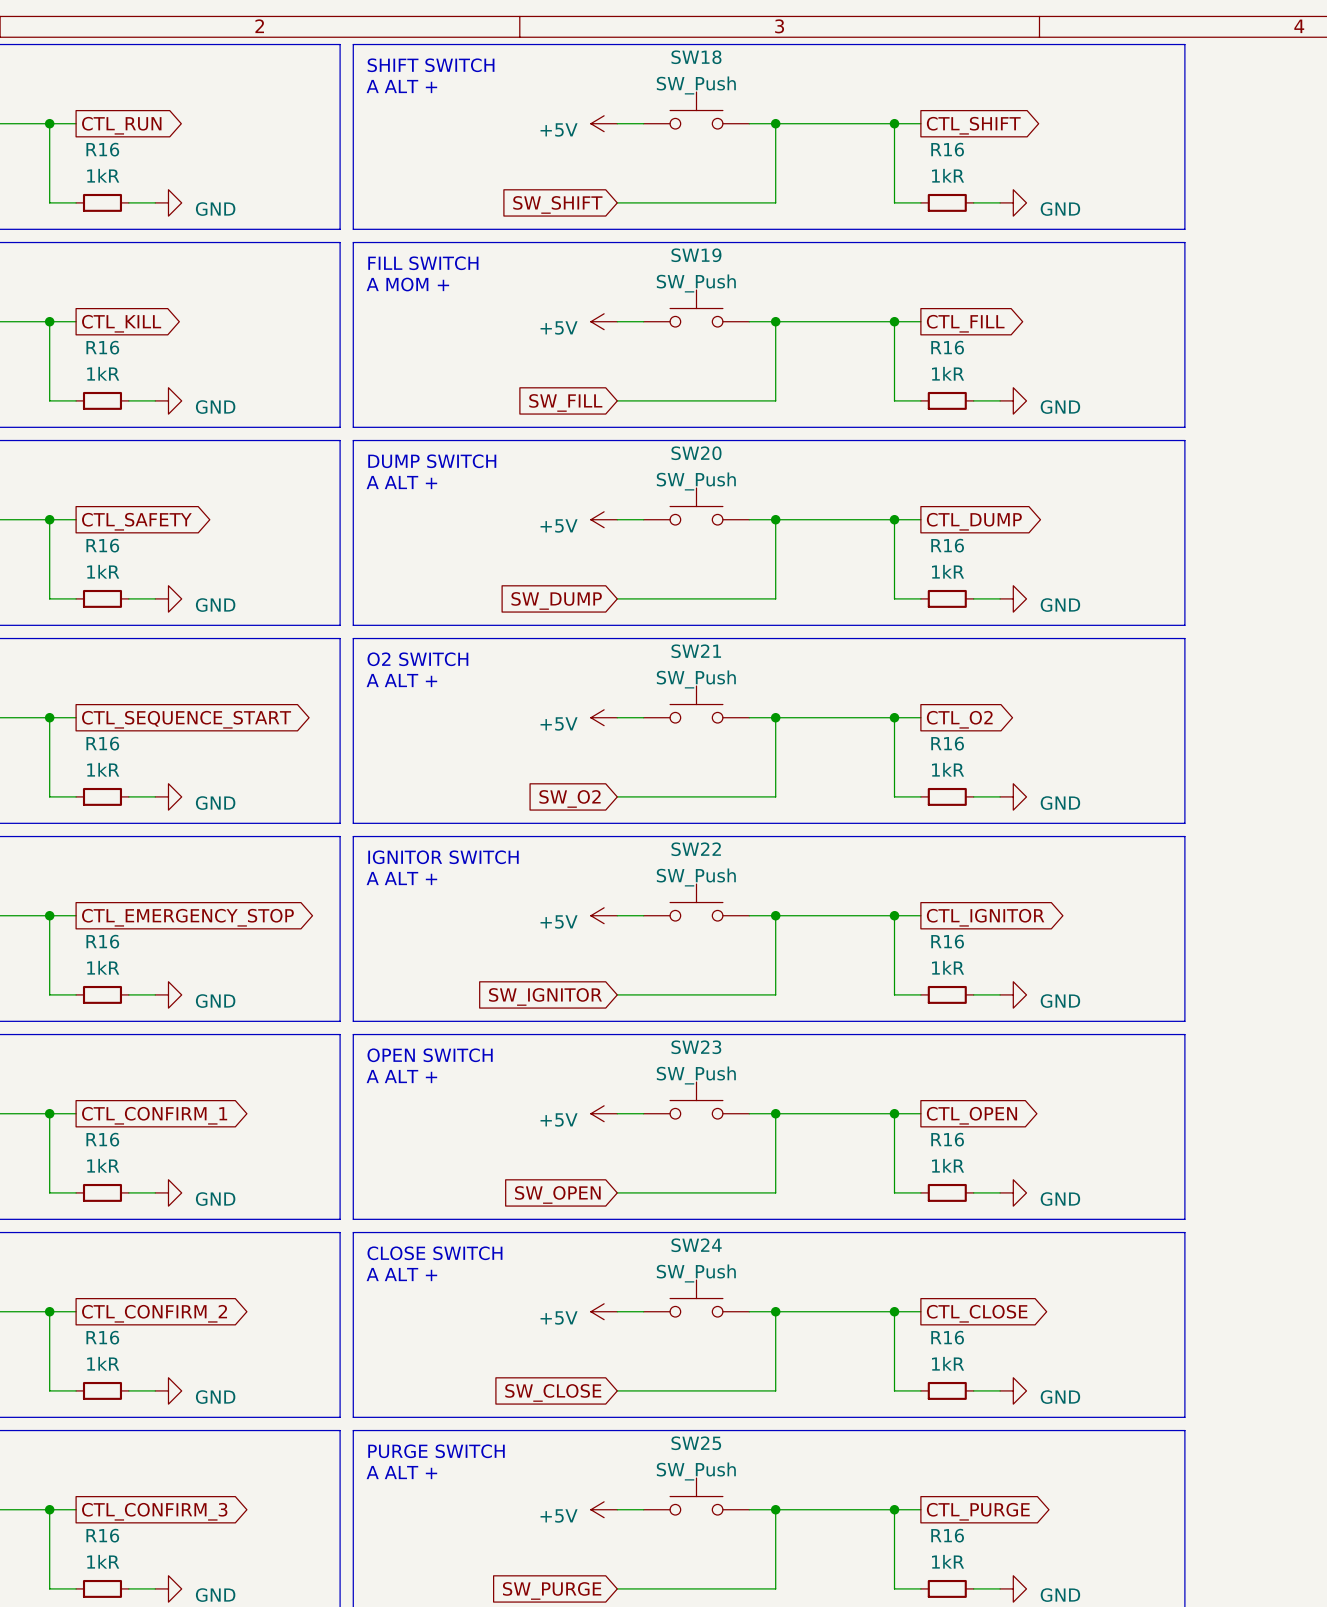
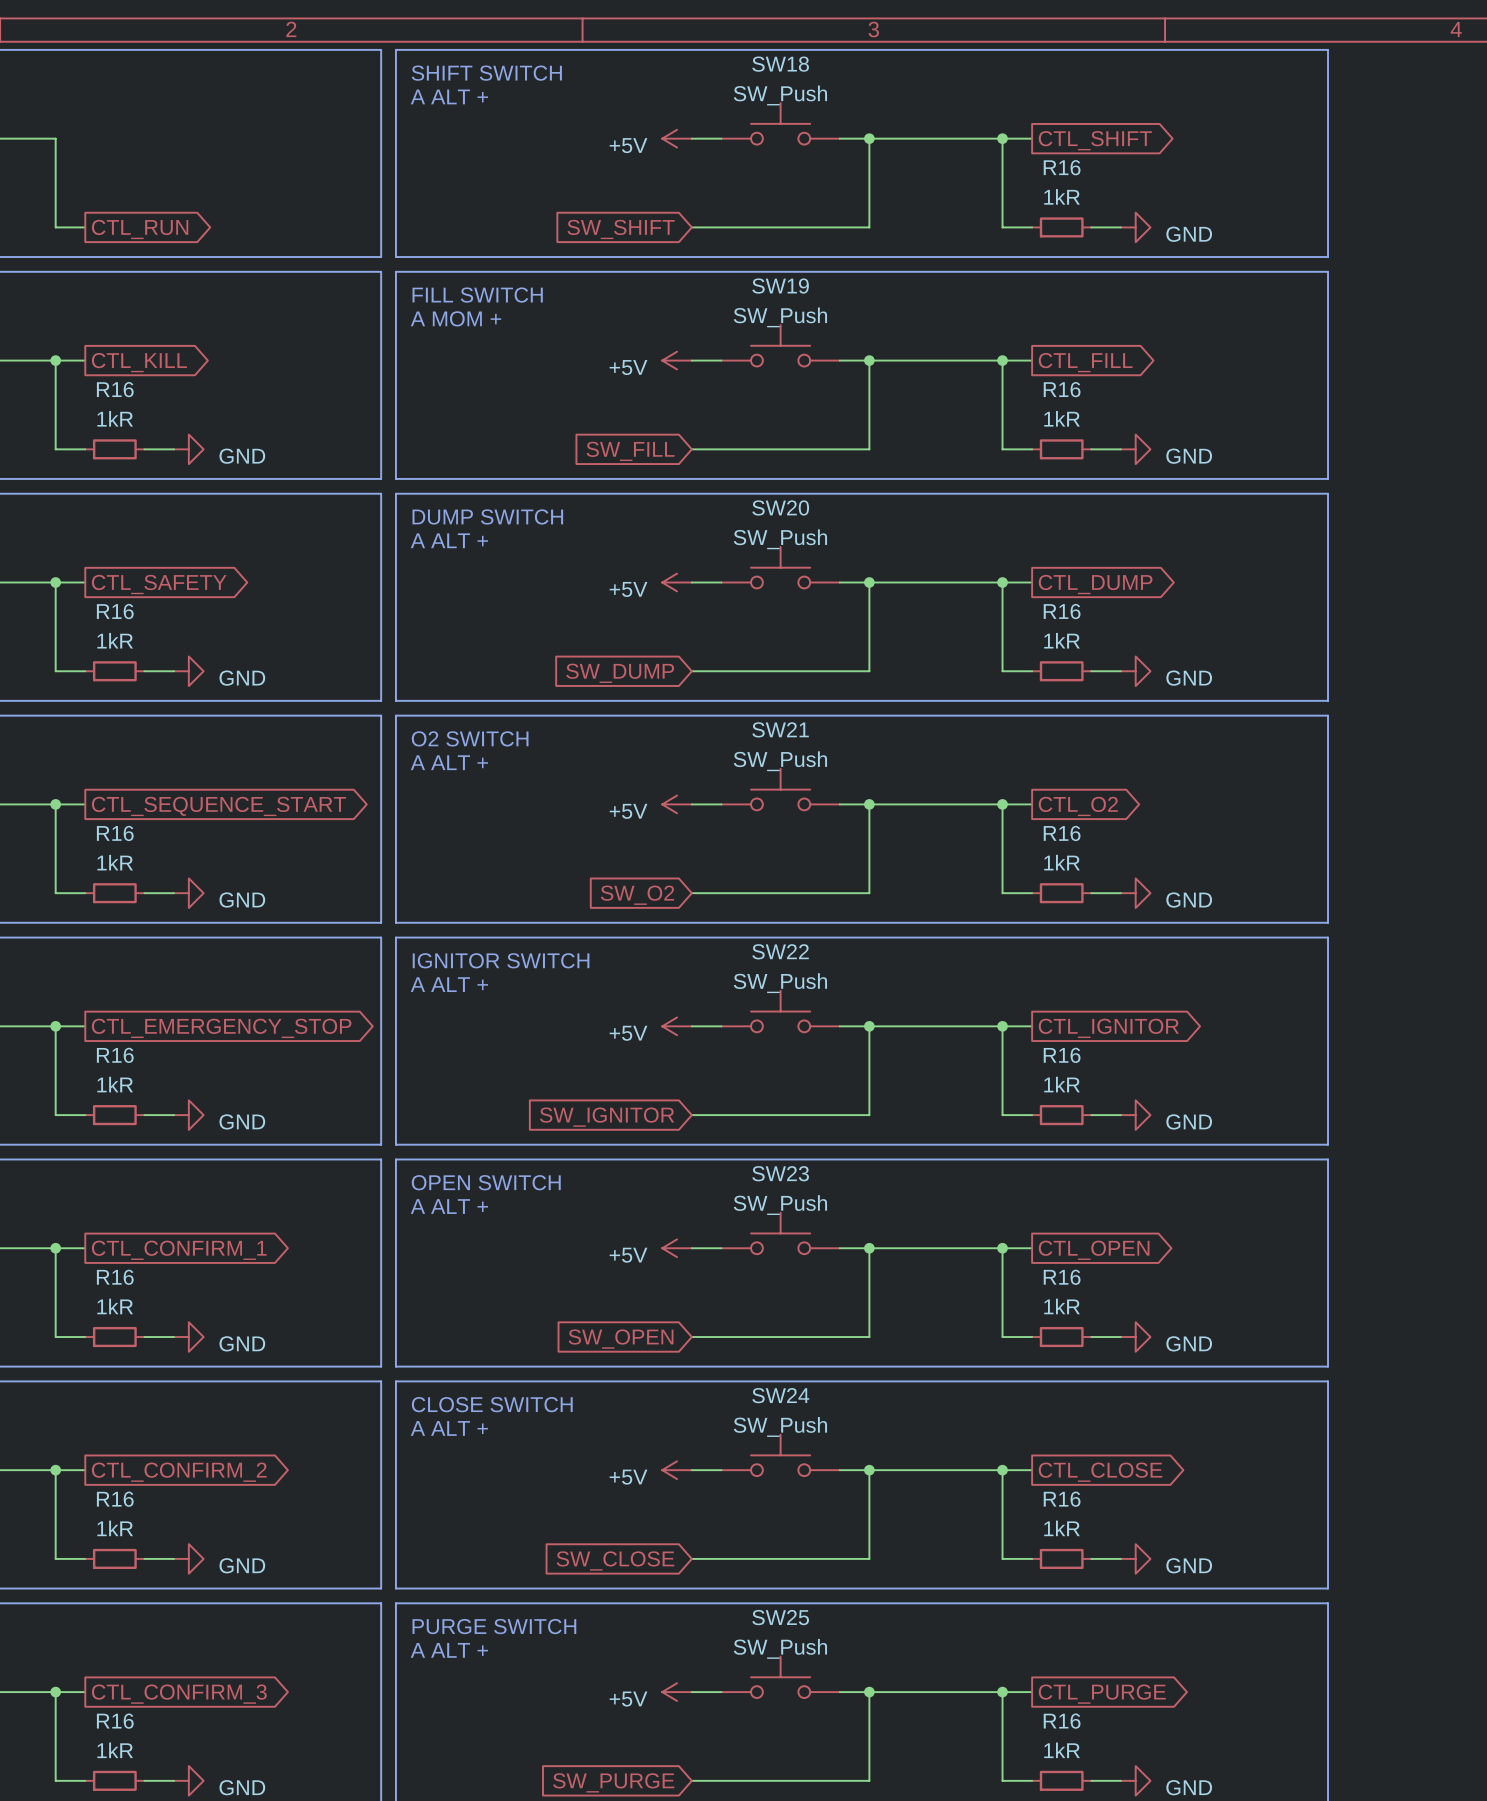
wire: (49, 123) (76, 123) -> none
junction: (49, 123) -> none
global label position: CTL_RUN (121, 125) -> CTL_RUN (140, 229)
R16: 1kR (102, 202) -> none
wire: (128, 202) (155, 202) -> none
power symbol: GND (168, 202) -> none

